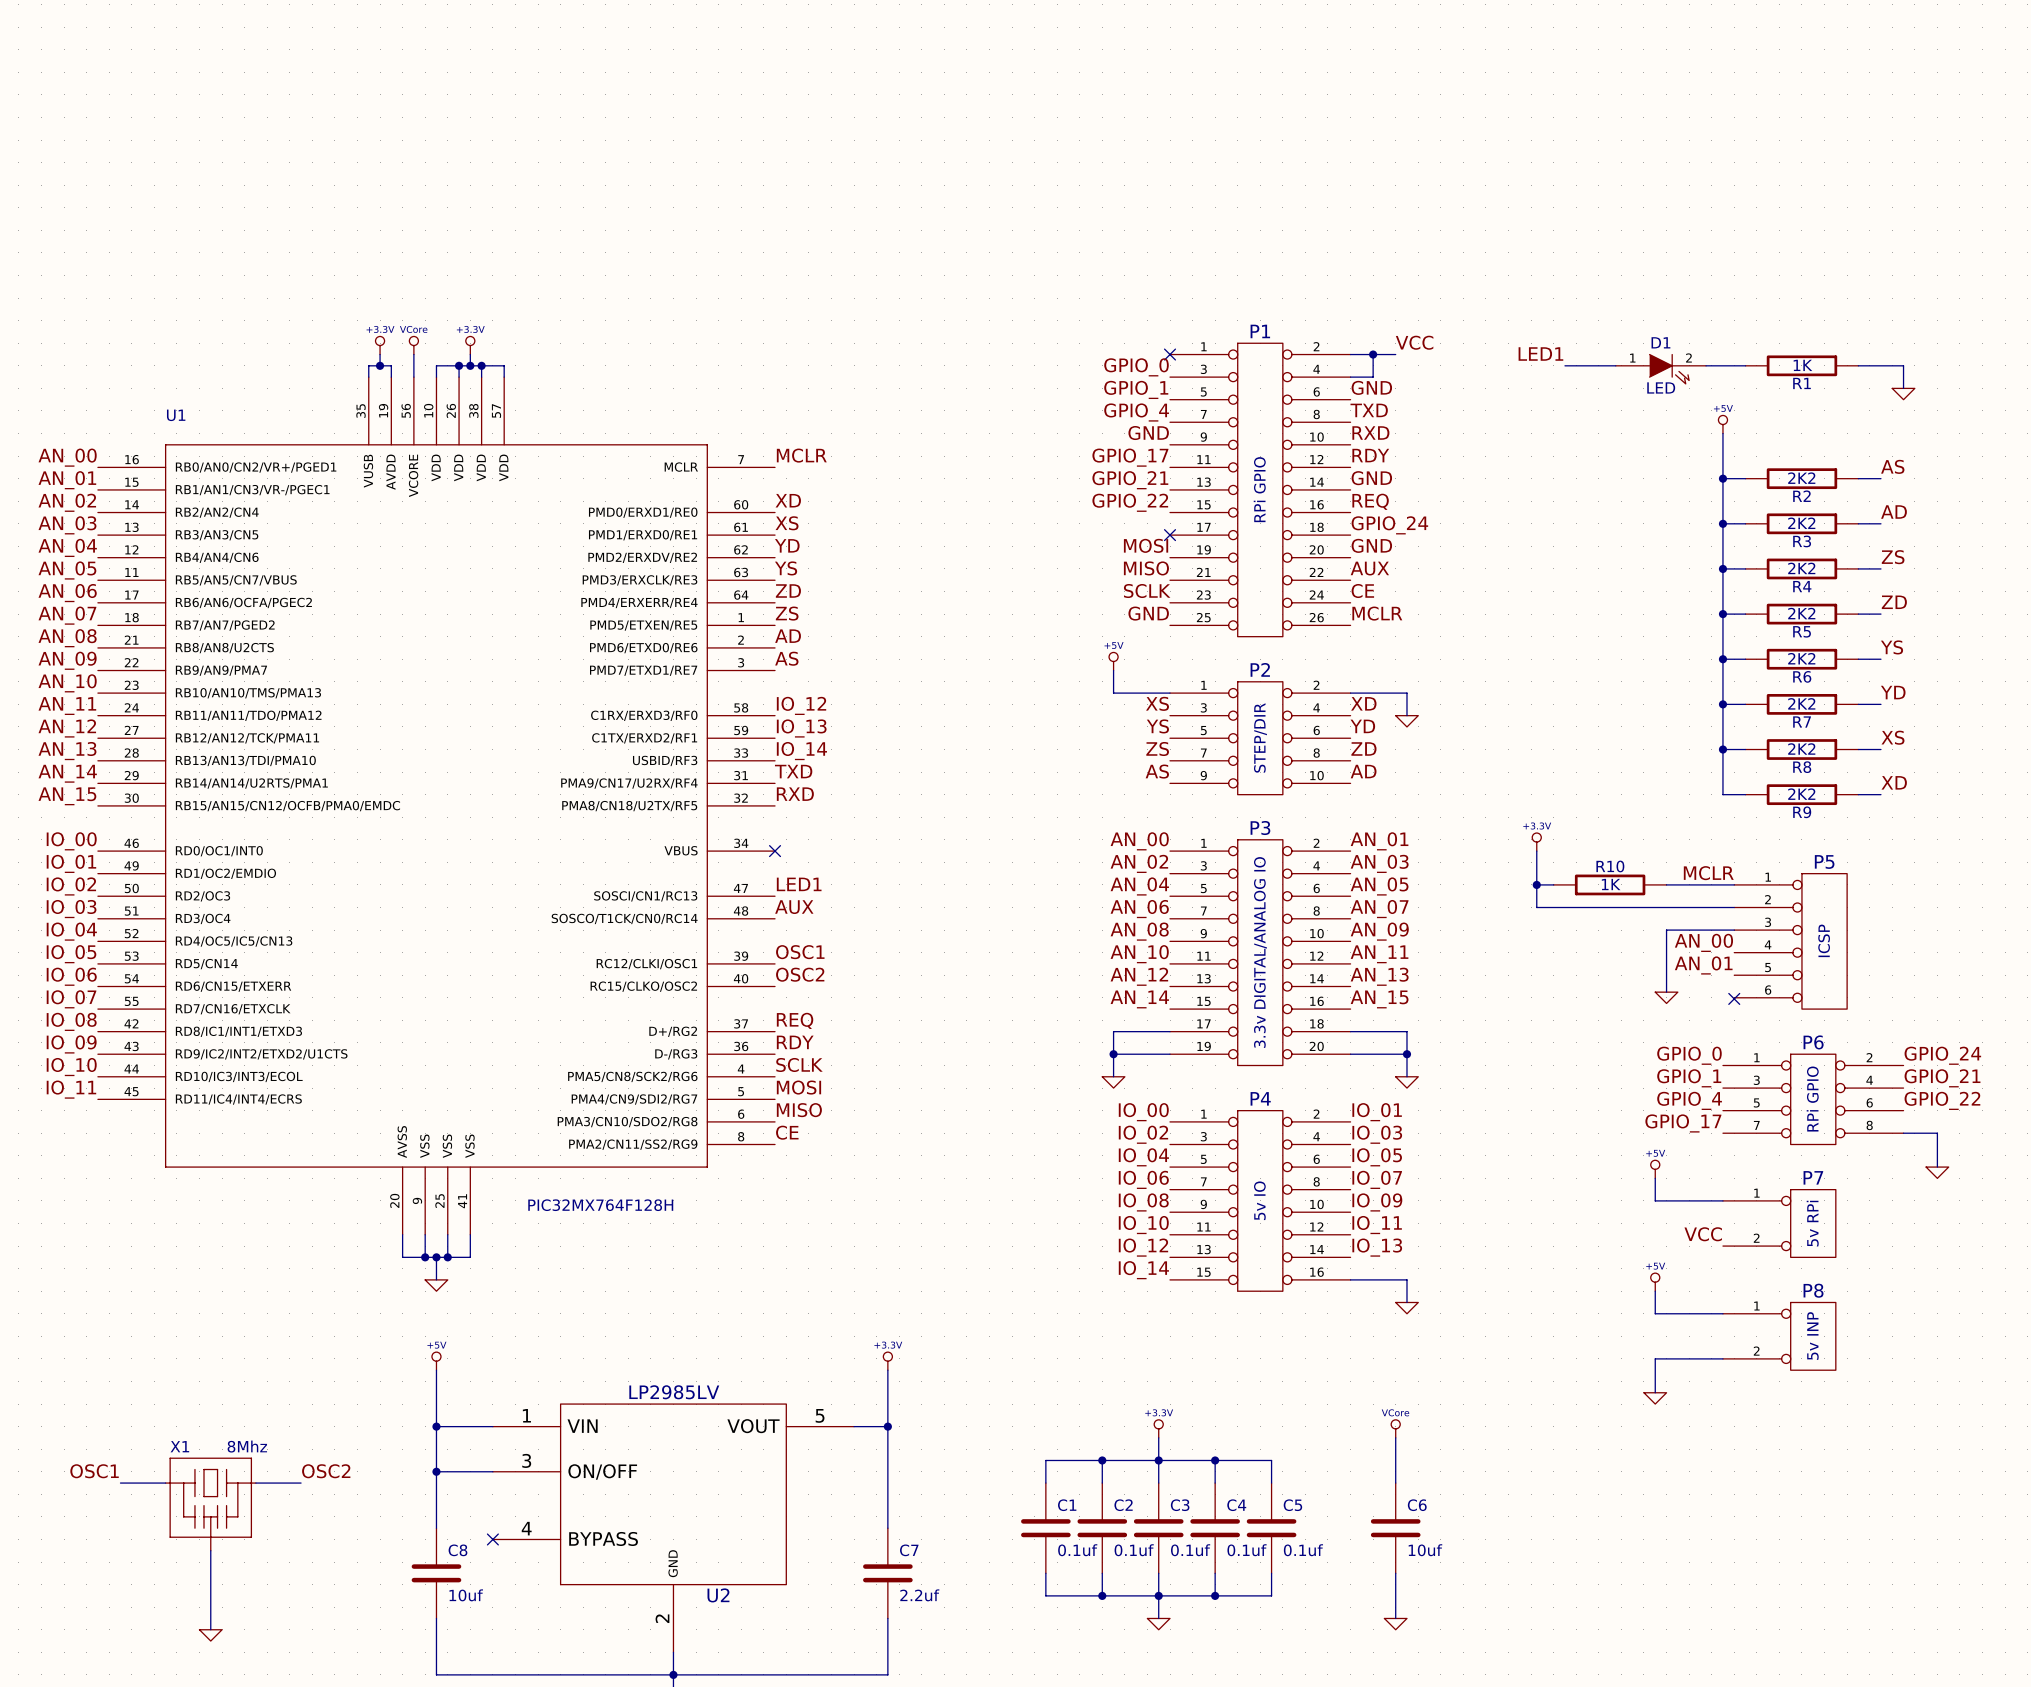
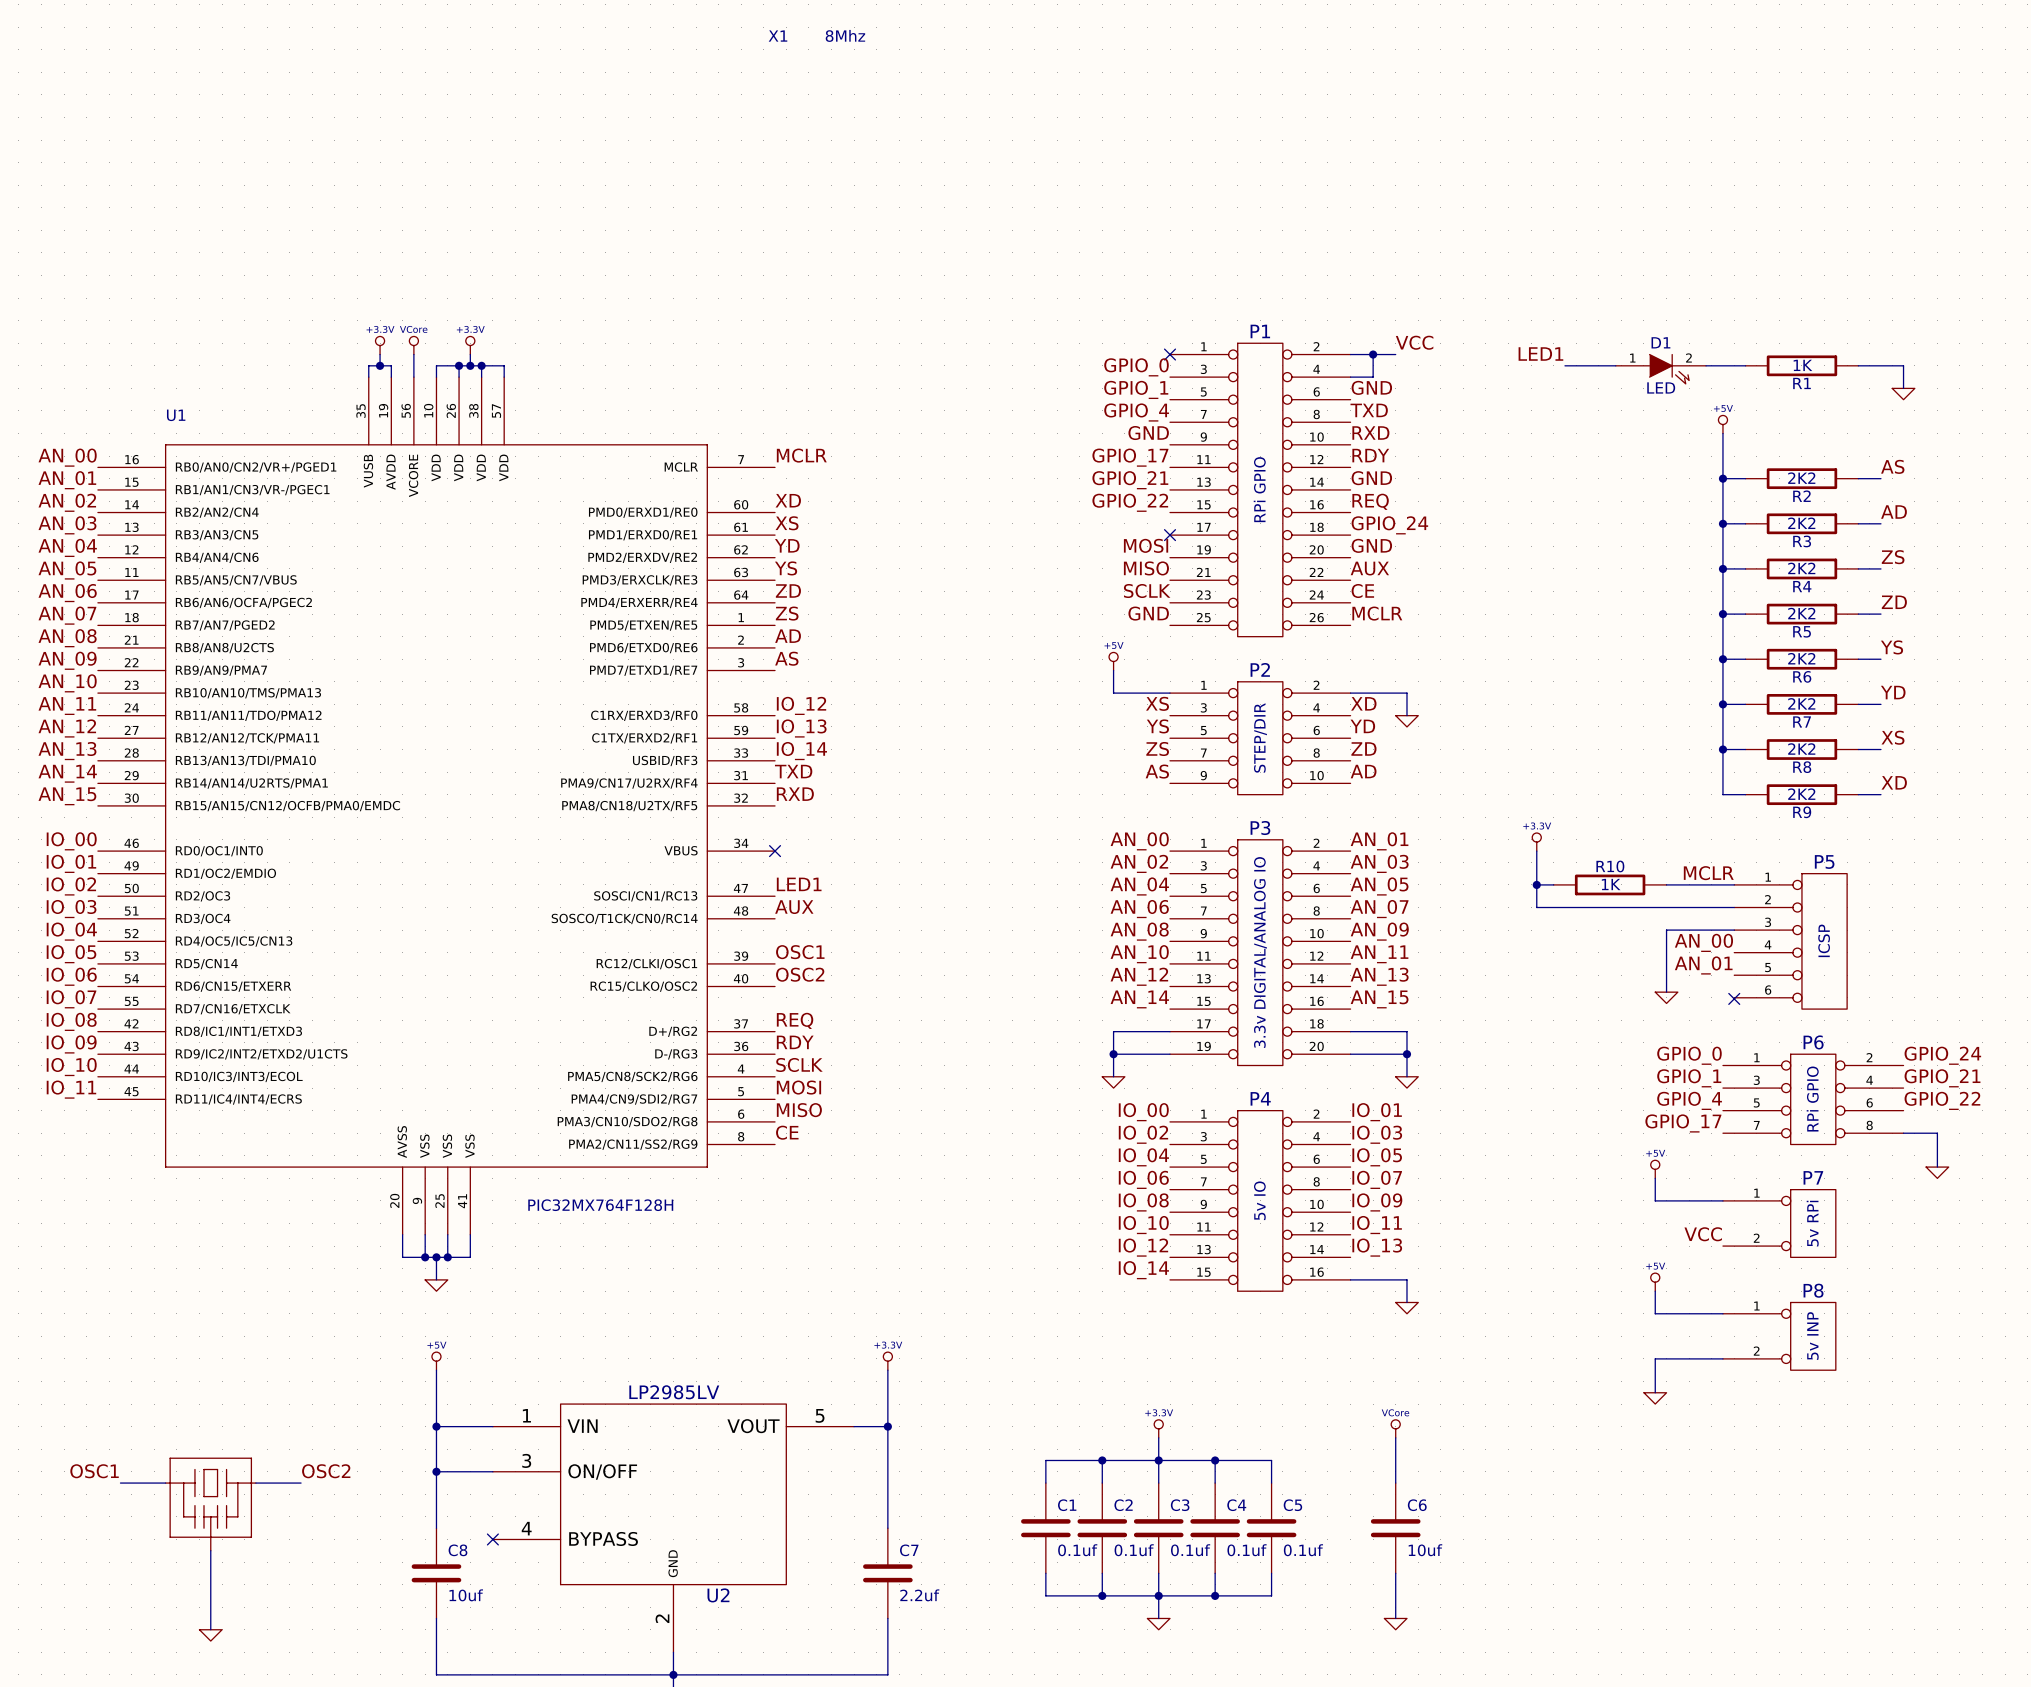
X1 name position: X1 (179, 1446) -> X1 (777, 36)
X1 value position: 8Mhz (247, 1446) -> 8Mhz (845, 35)

